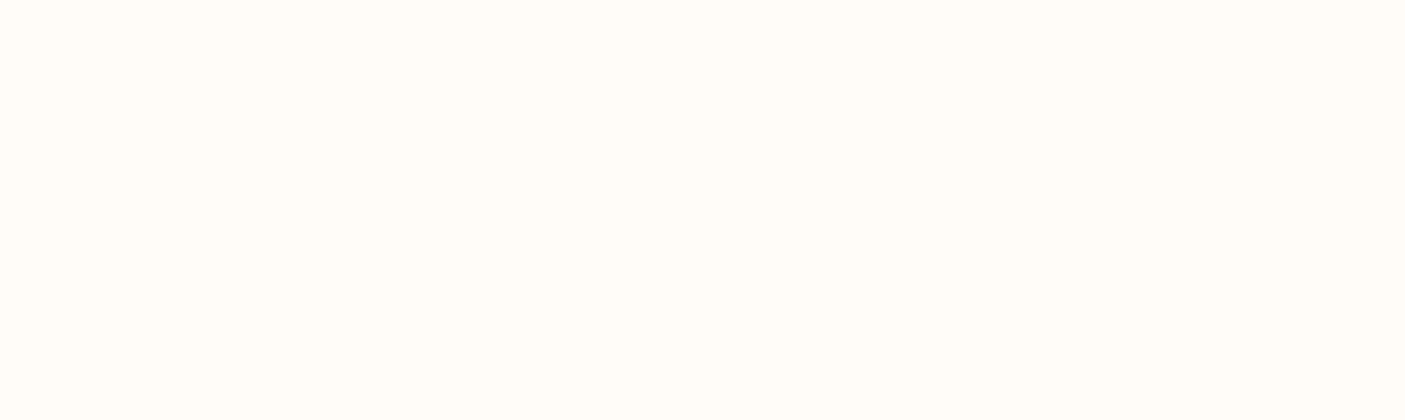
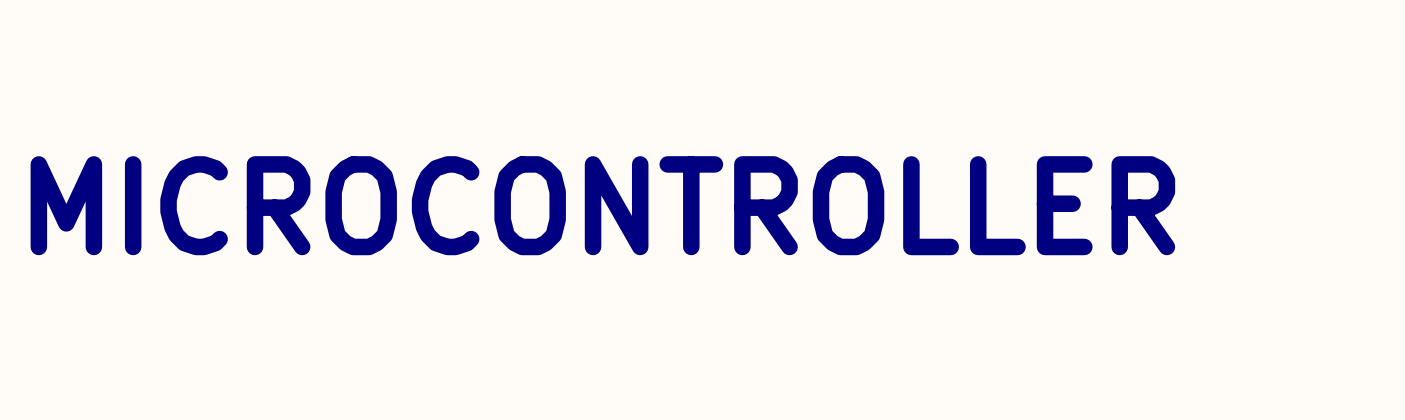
text: none -> MICROCONTROLLER (602, 205)

